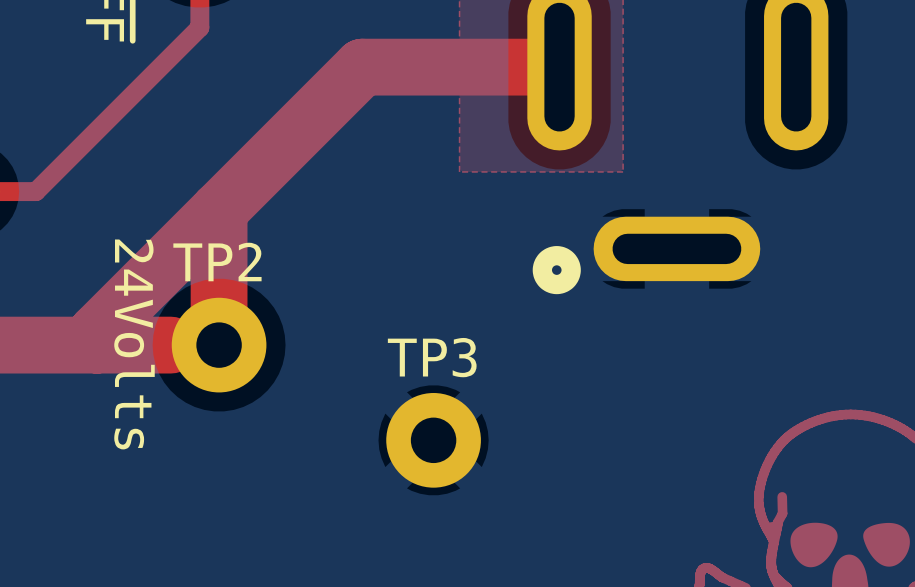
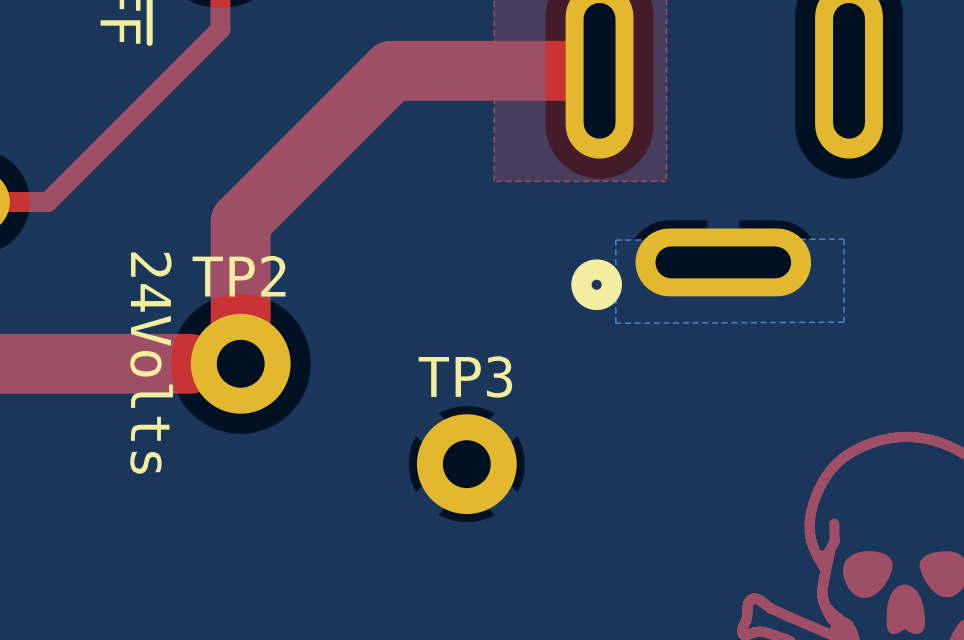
top track: (219, 210) (96, 332) (96, 345) -> none
bottom zone outline: none -> (843, 239) (615, 240) (615, 323) (843, 322) (843, 239)

